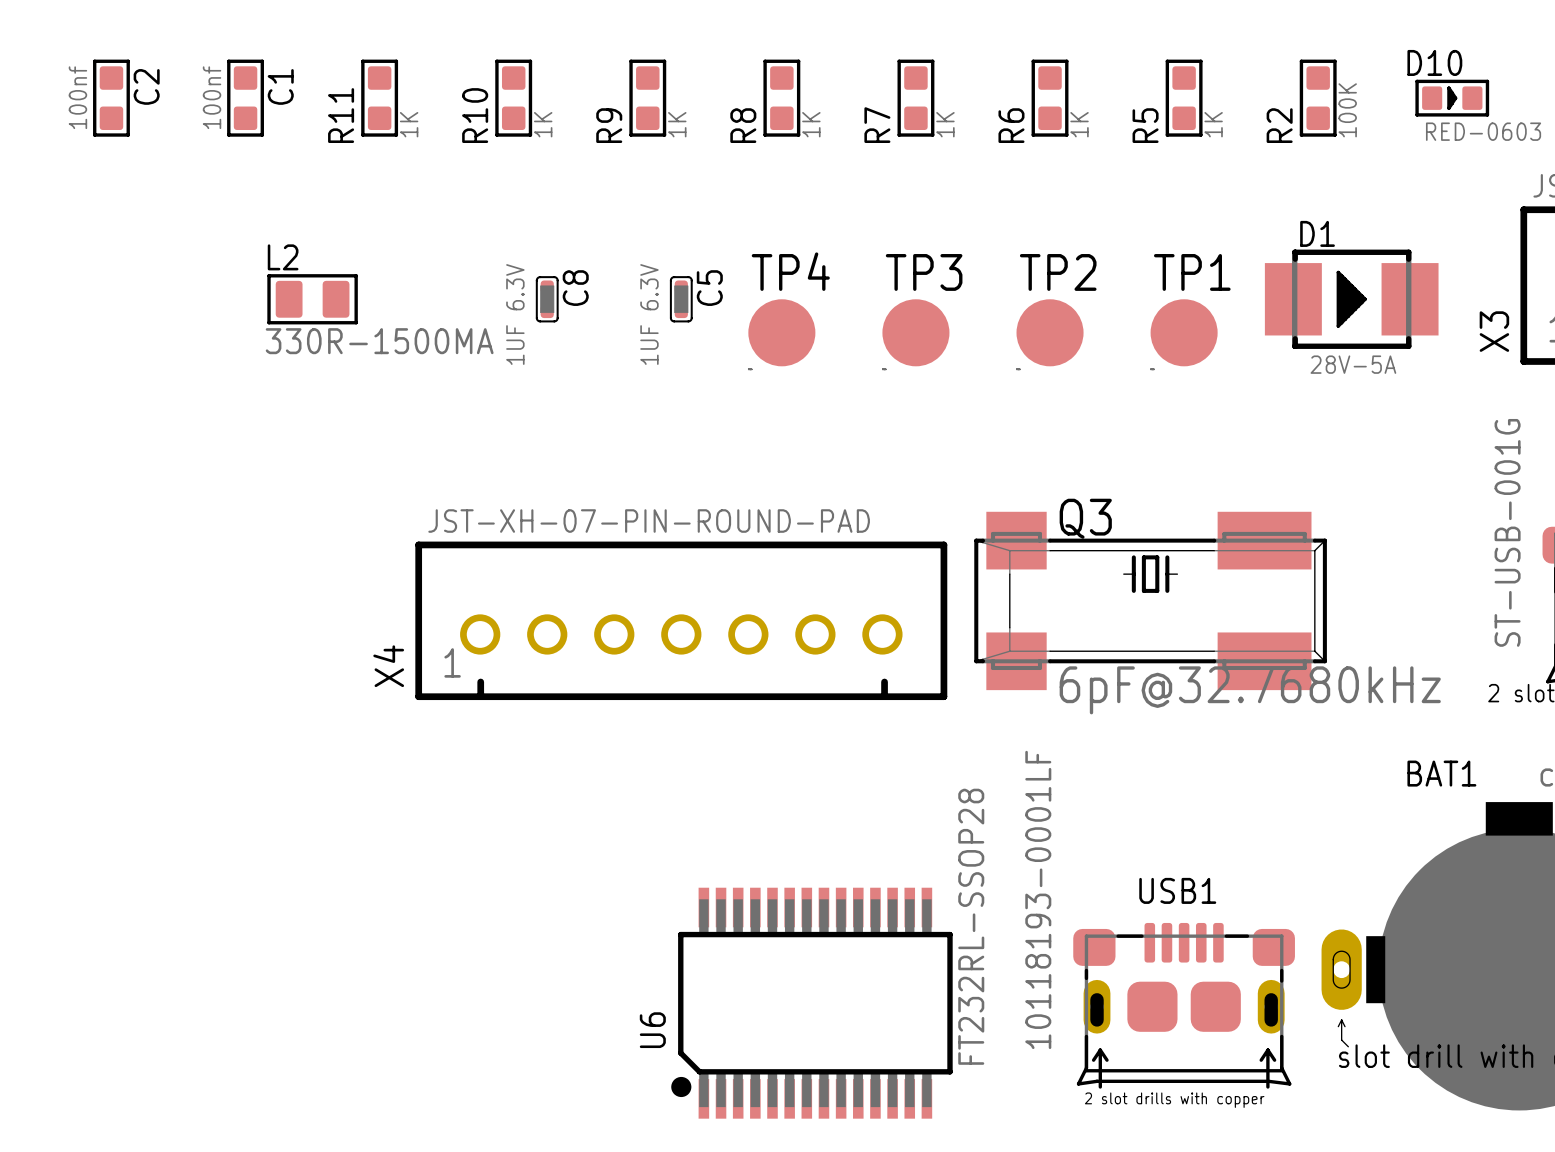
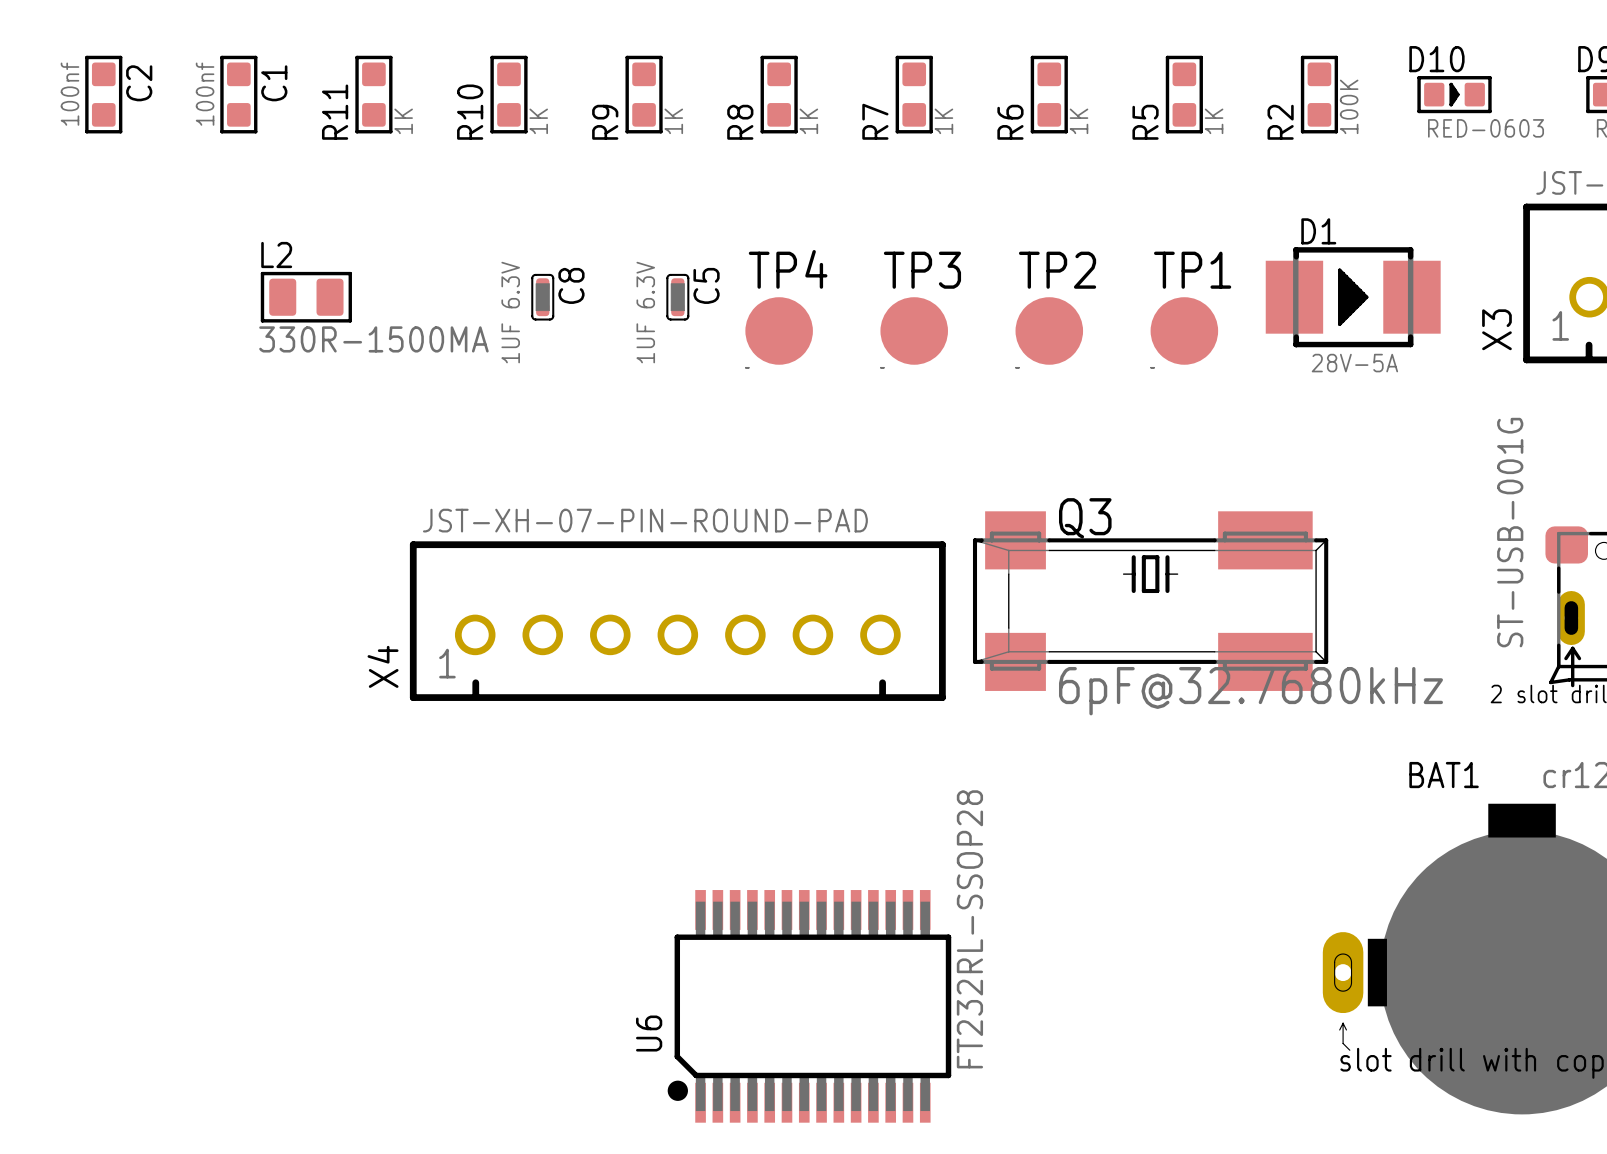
USB1: 10118193-0001LF (1184, 1005) -> none

